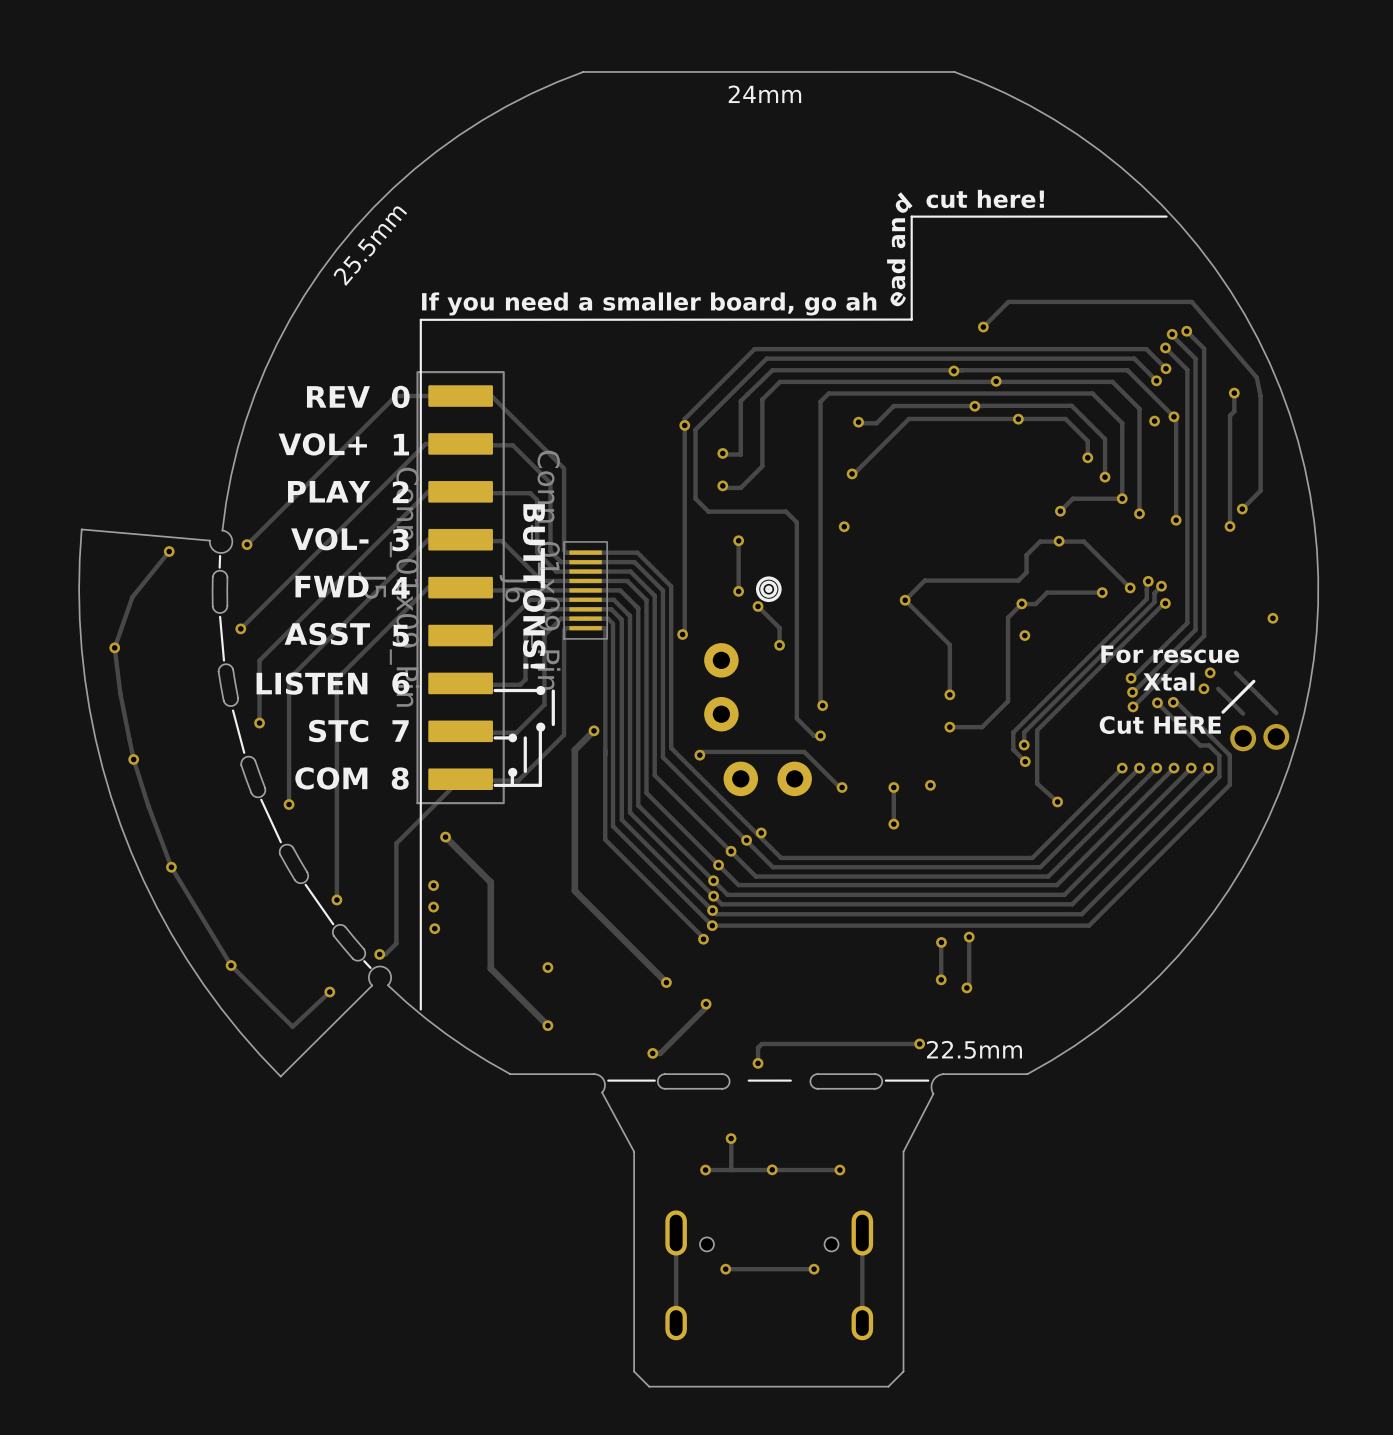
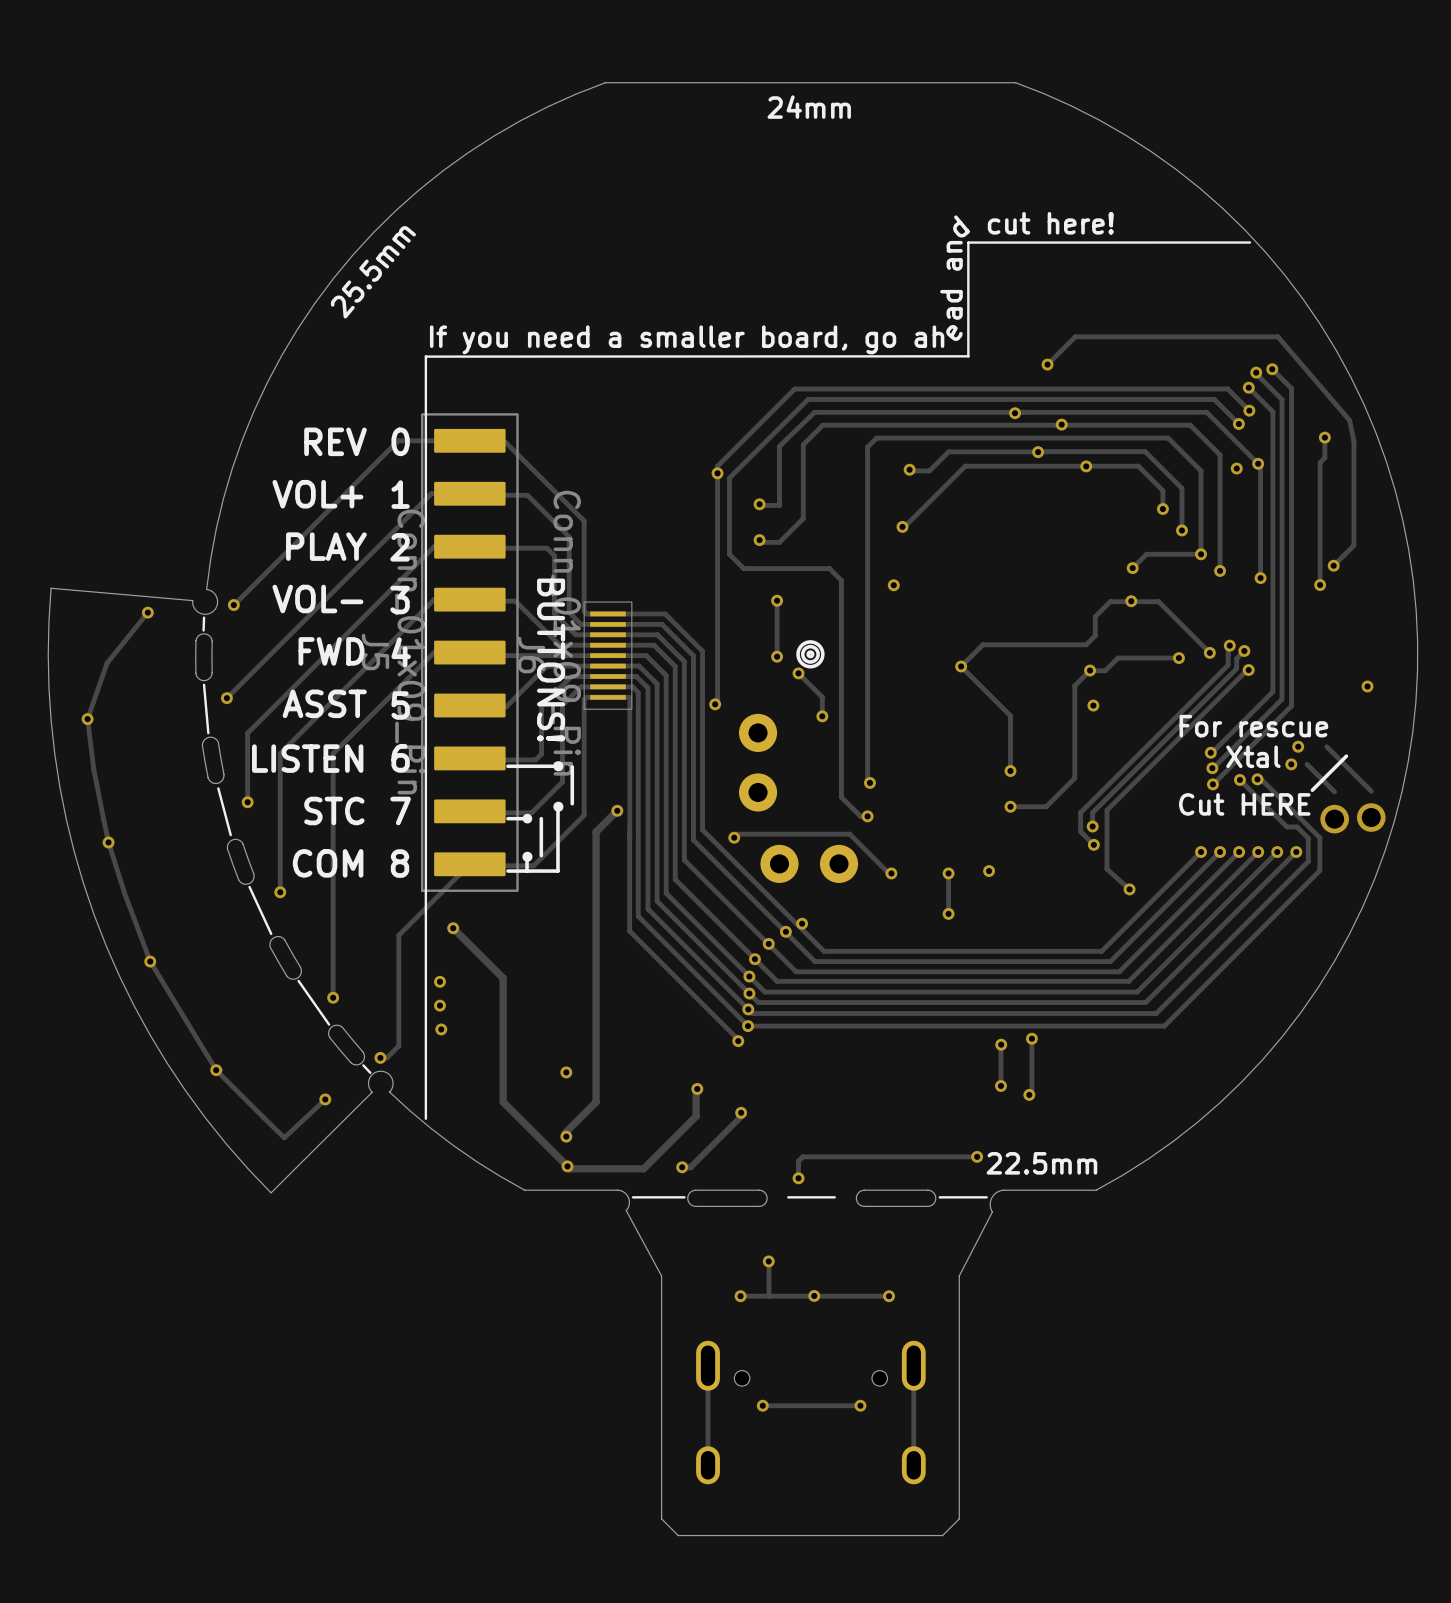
track: (574, 890) (666, 982) -> (596, 987) (596, 1102) (565, 1133)
track: (490, 968) (547, 1025) -> (503, 1073) (503, 1102) (569, 1168) (643, 1168) (696, 1116) (696, 1087)
via: none -> (567, 1166)

